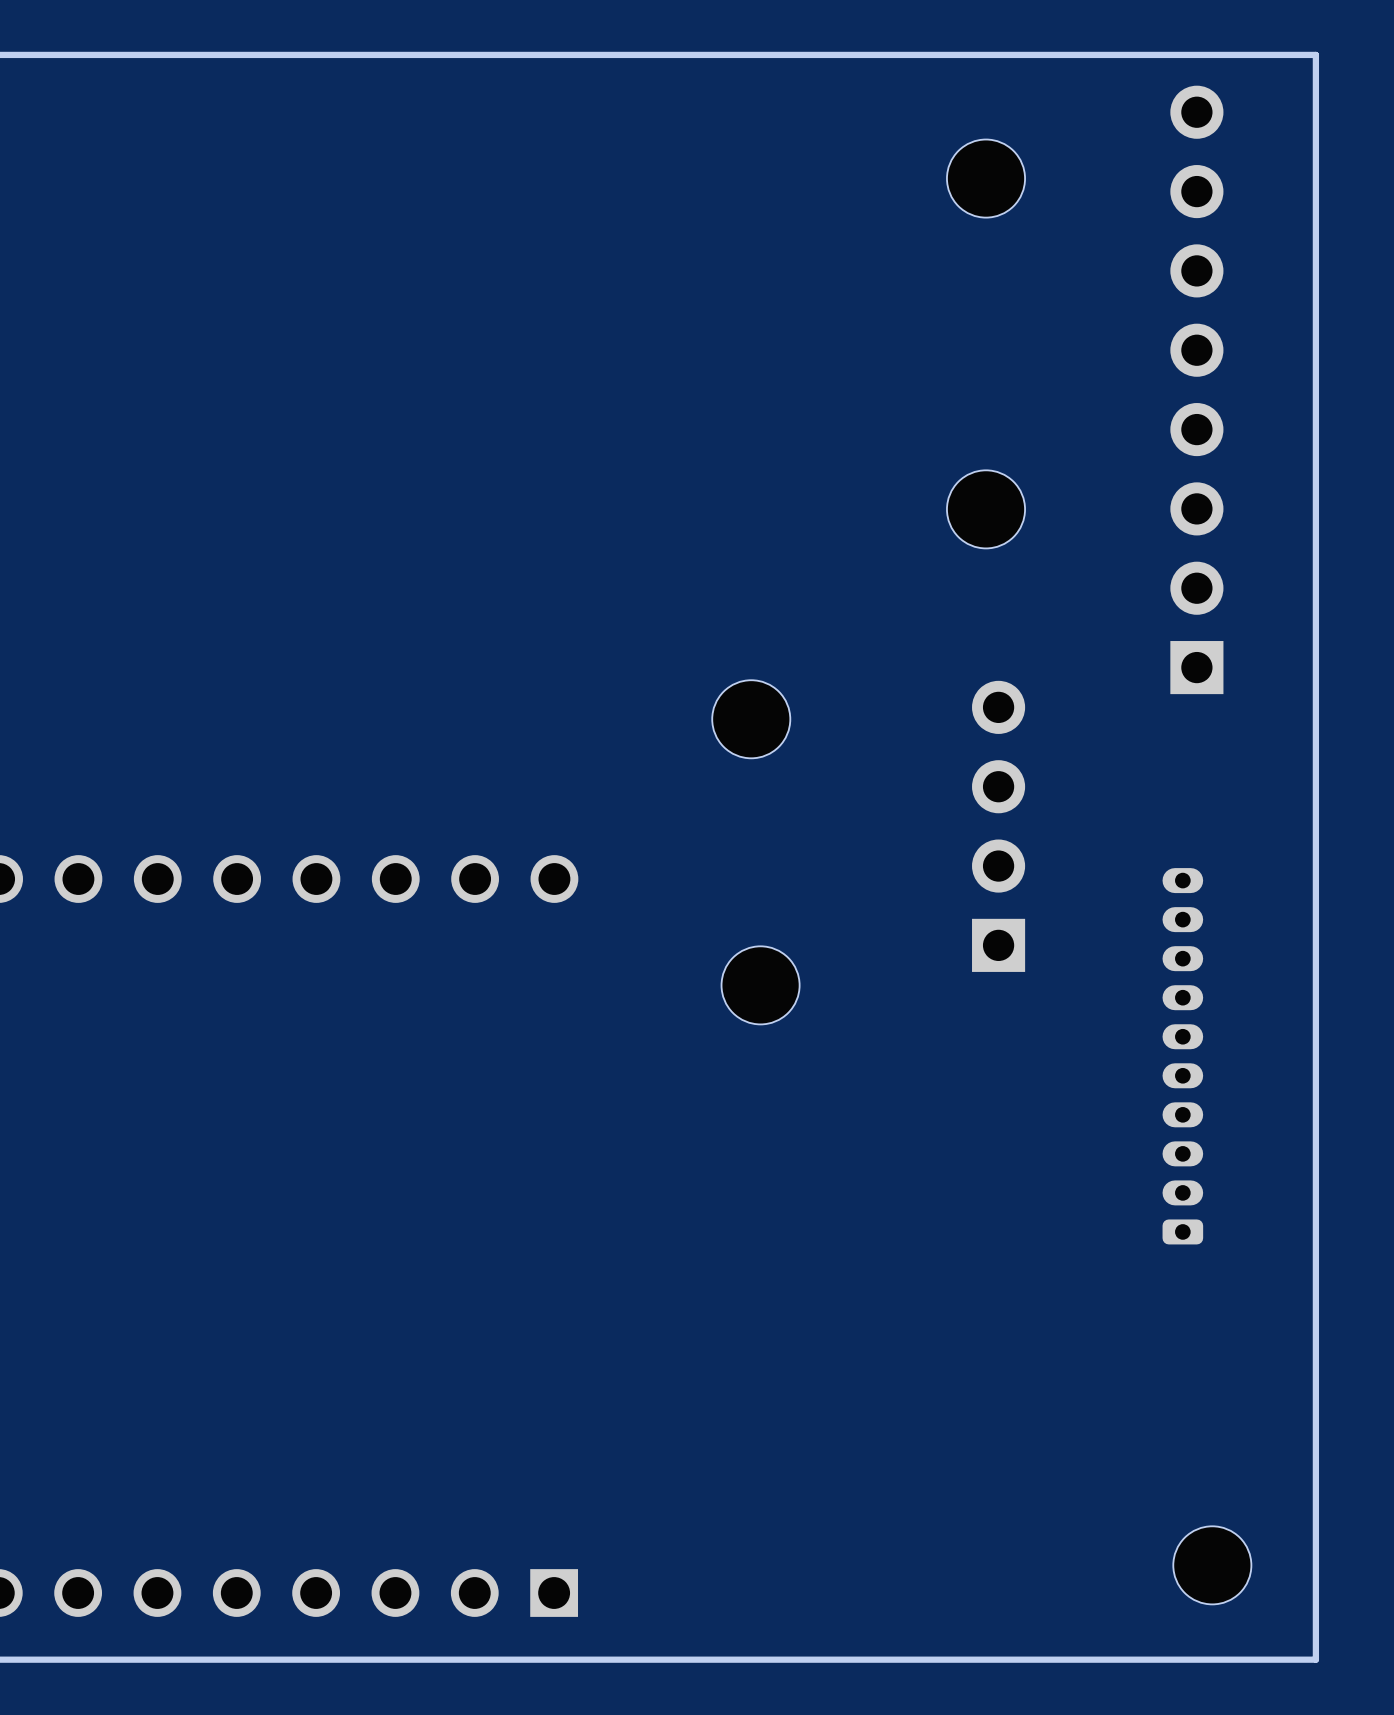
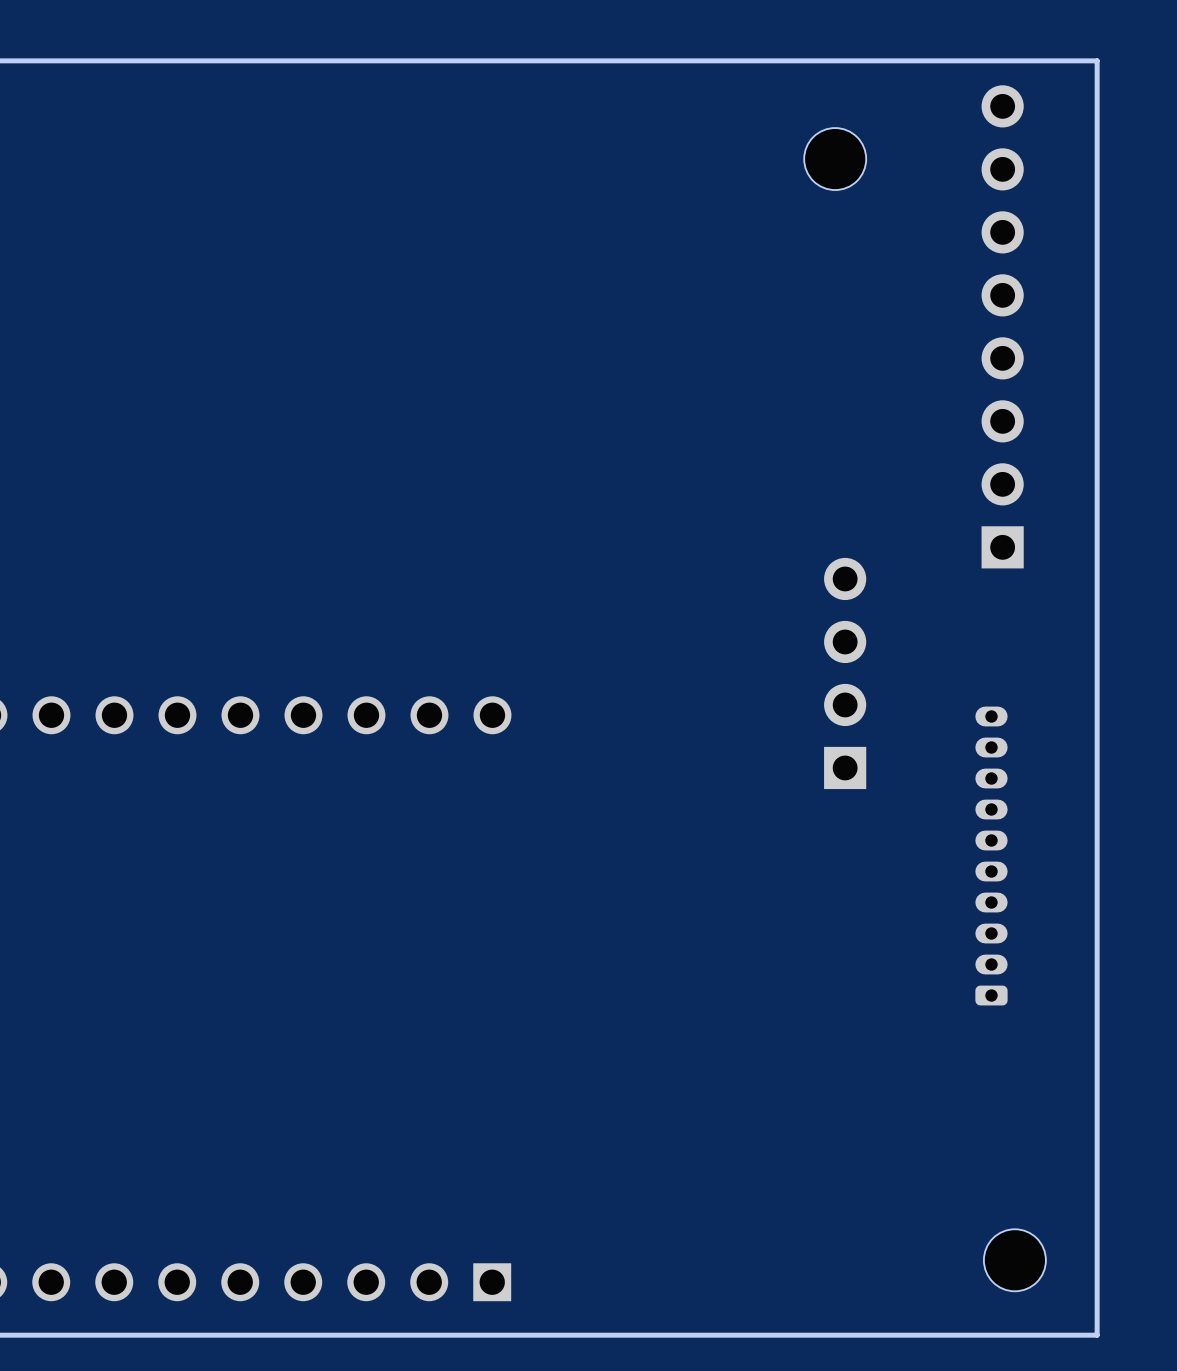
part: (986, 509) -> none
part: (751, 719) -> none
part: (760, 985) -> none

